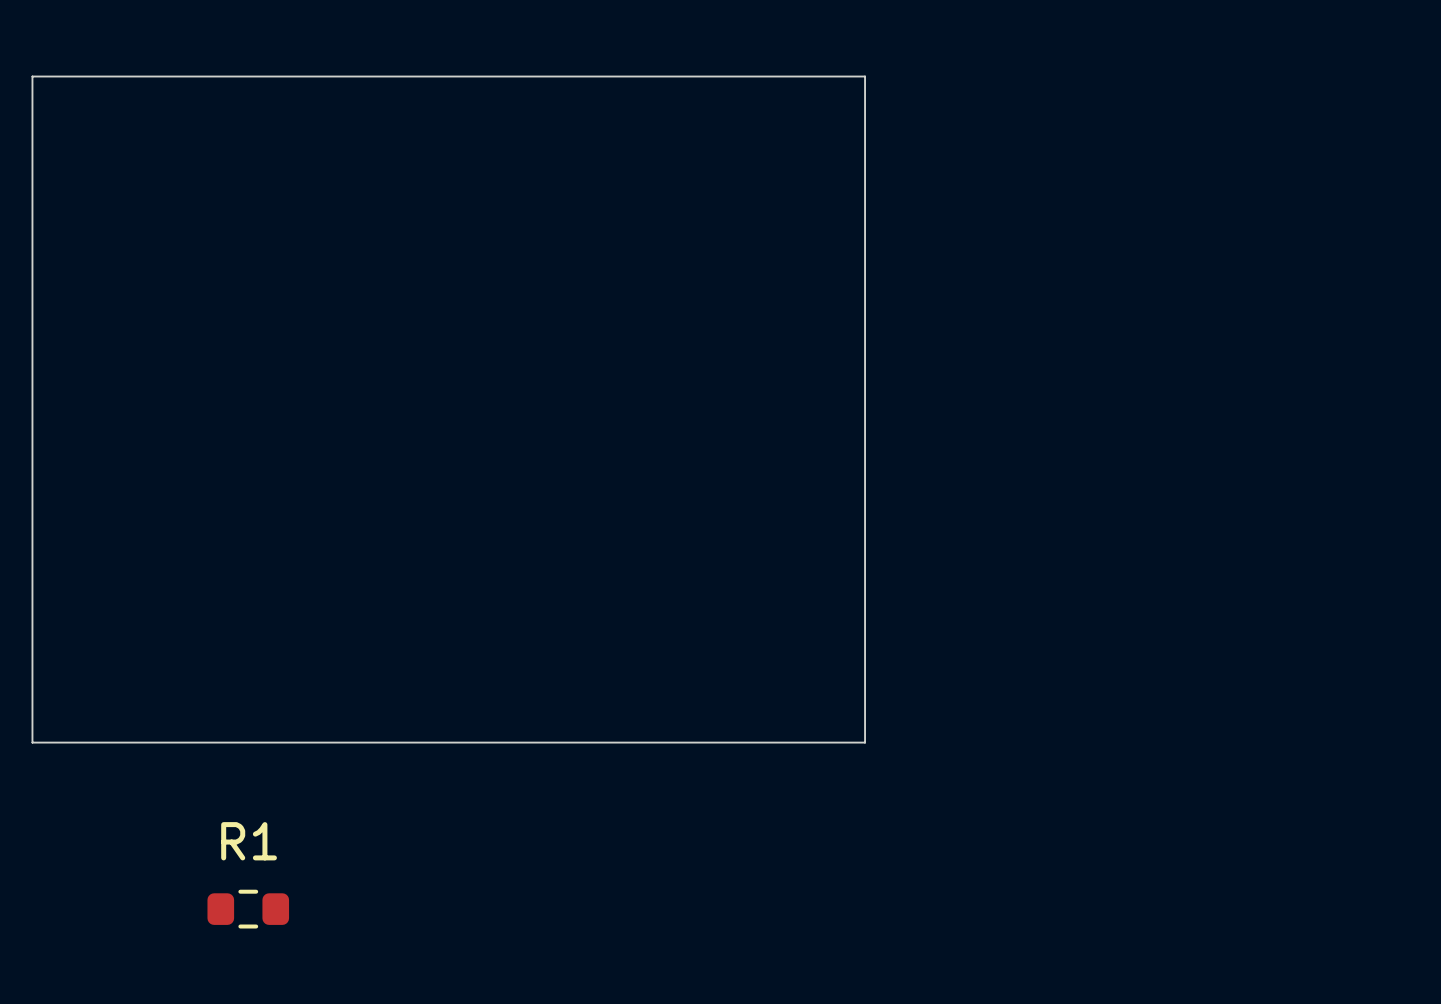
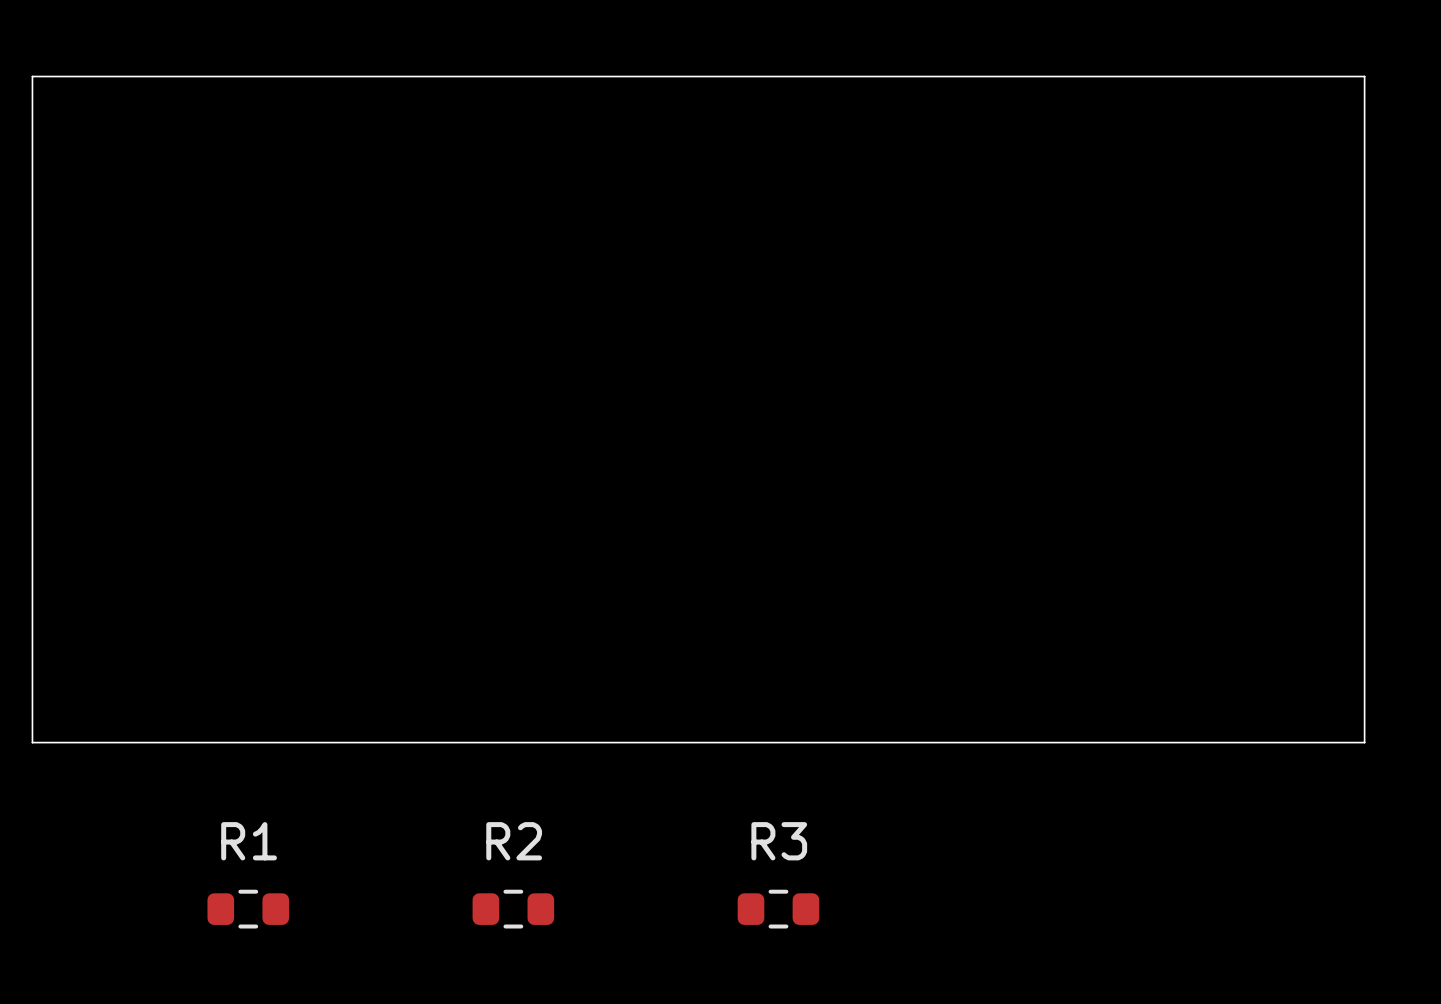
board edge: (865, 76) (865, 742) -> (865, 76) (1364, 76) (1364, 742) (865, 742)
R2: none -> (513, 909)
R3: none -> (778, 909)

